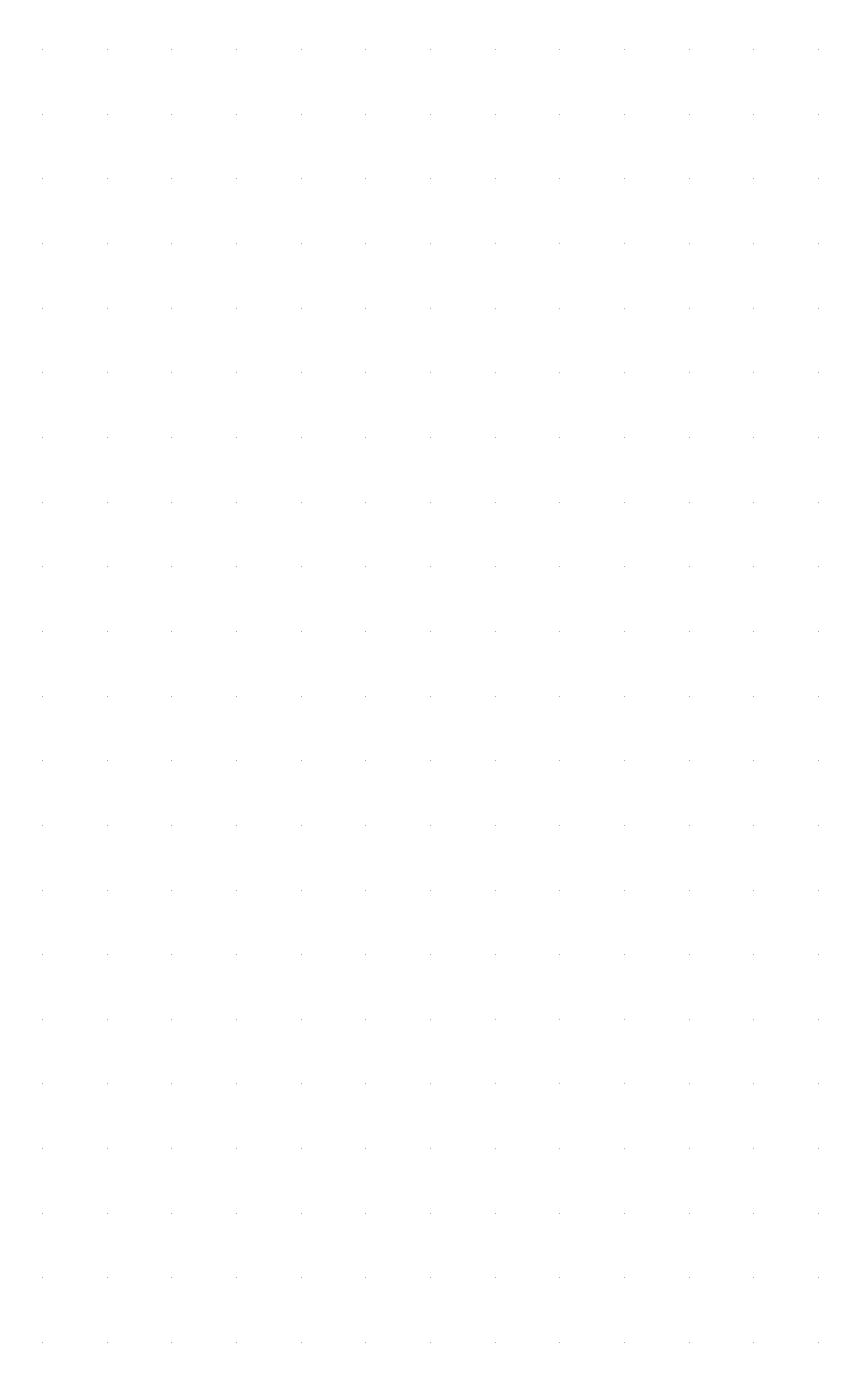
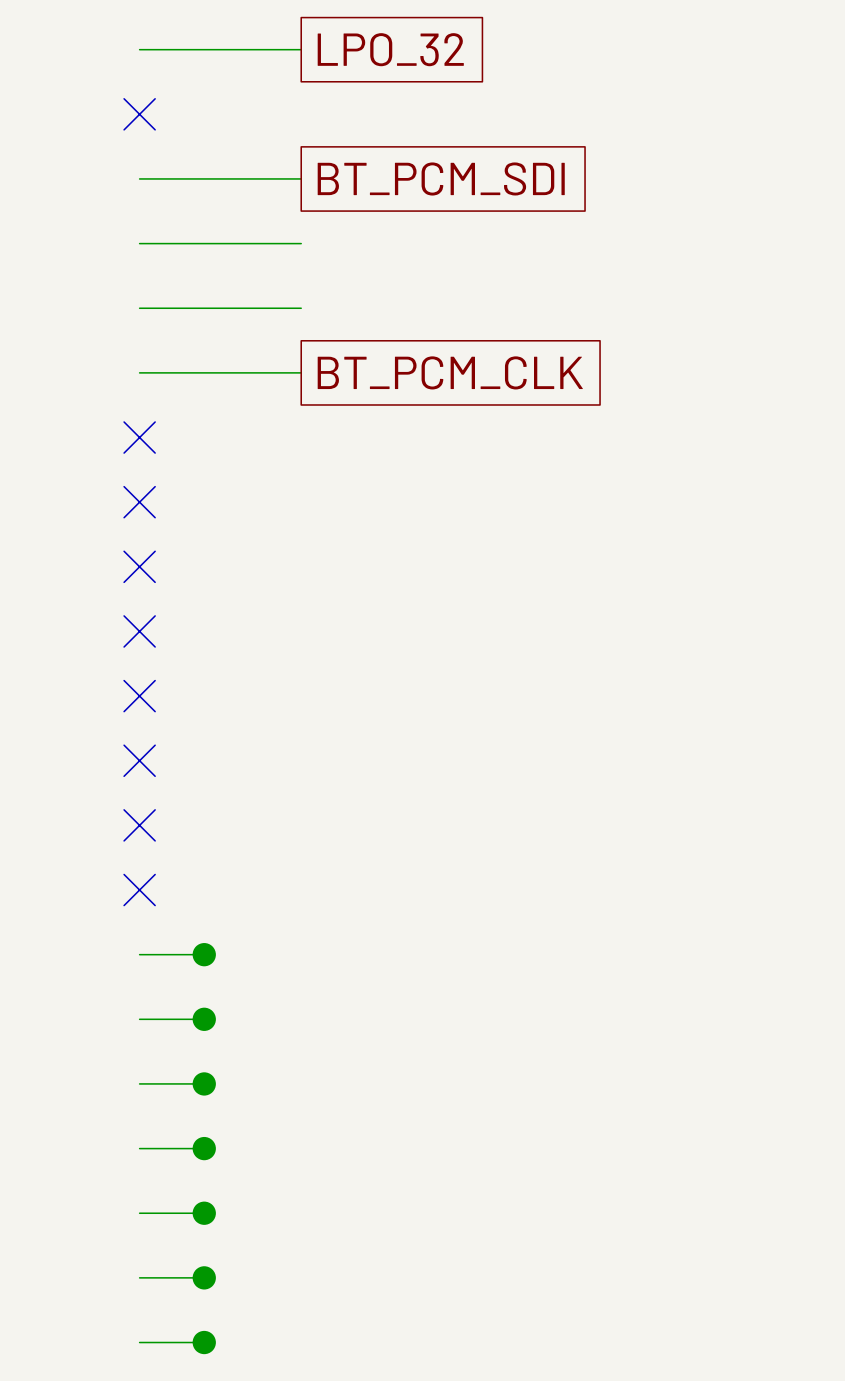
wire: none -> (139, 49) (301, 49)
global label: none -> LPO_32 (390, 49)
no-connect mark: none -> (139, 114)
wire: none -> (139, 178) (301, 178)
global label: none -> BT_PCM_SDI (441, 178)
wire: none -> (139, 243) (301, 243)
wire: none -> (139, 308) (301, 308)
wire: none -> (139, 372) (301, 372)
global label: none -> BT_PCM_CLK (450, 372)
no-connect mark: none -> (139, 437)
no-connect mark: none -> (139, 502)
no-connect mark: none -> (139, 566)
no-connect mark: none -> (139, 631)
no-connect mark: none -> (139, 696)
no-connect mark: none -> (139, 760)
no-connect mark: none -> (139, 825)
no-connect mark: none -> (139, 890)
wire: none -> (139, 954) (204, 954)
junction: none -> (204, 954)
wire: none -> (139, 1019) (204, 1019)
junction: none -> (204, 1019)
wire: none -> (139, 1083) (204, 1083)
junction: none -> (204, 1083)
wire: none -> (139, 1148) (204, 1148)
junction: none -> (204, 1148)
wire: none -> (139, 1213) (204, 1213)
junction: none -> (204, 1213)
wire: none -> (139, 1277) (204, 1277)
junction: none -> (204, 1277)
wire: none -> (139, 1342) (204, 1342)
junction: none -> (204, 1342)

